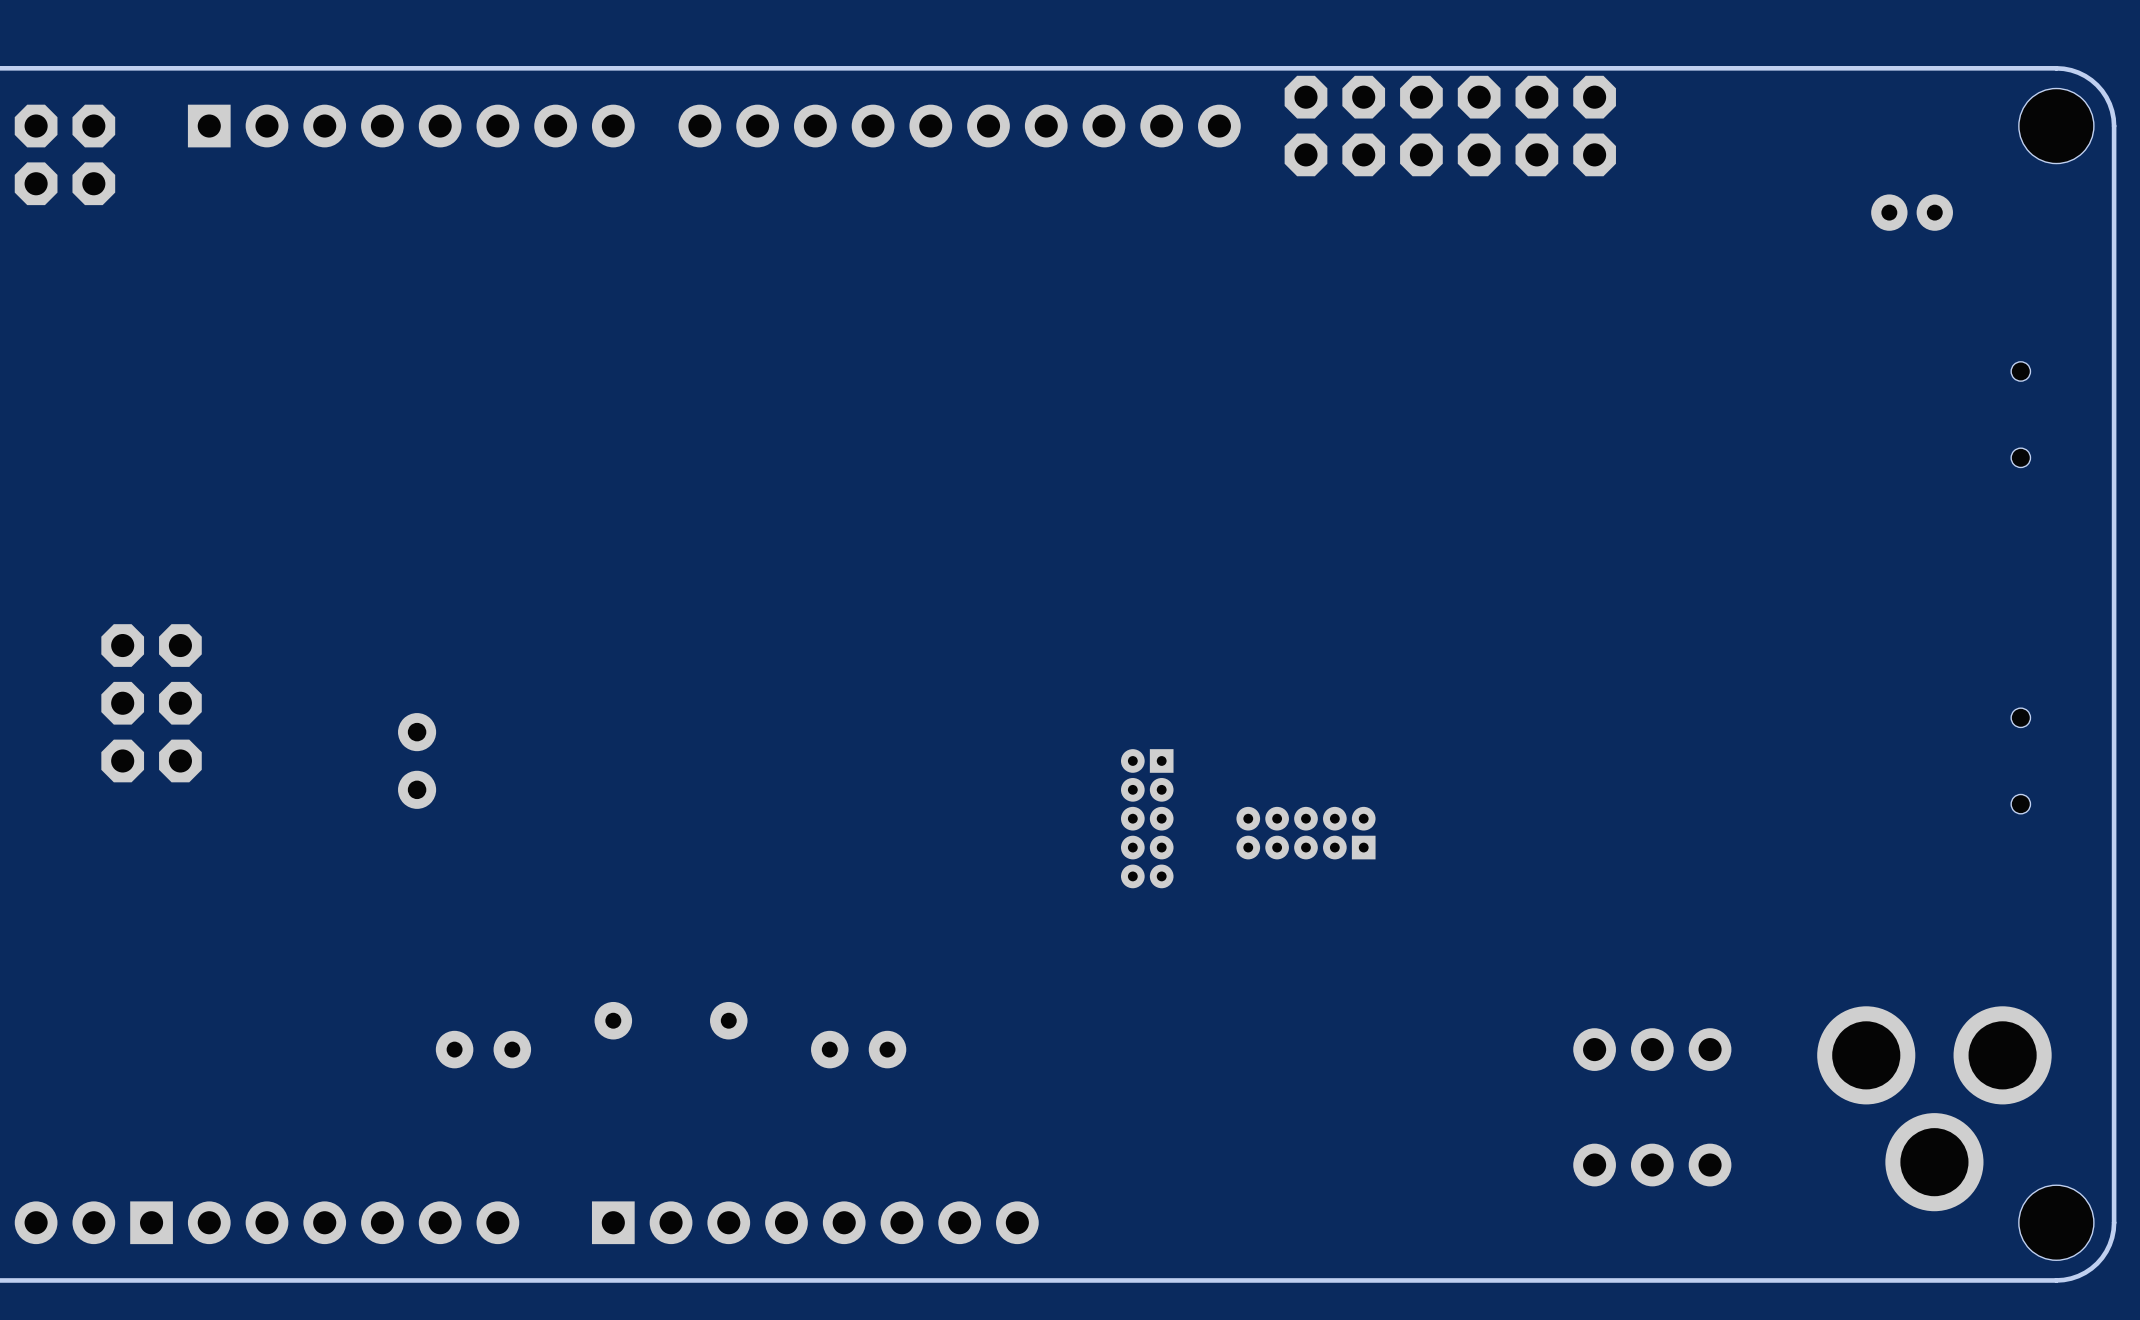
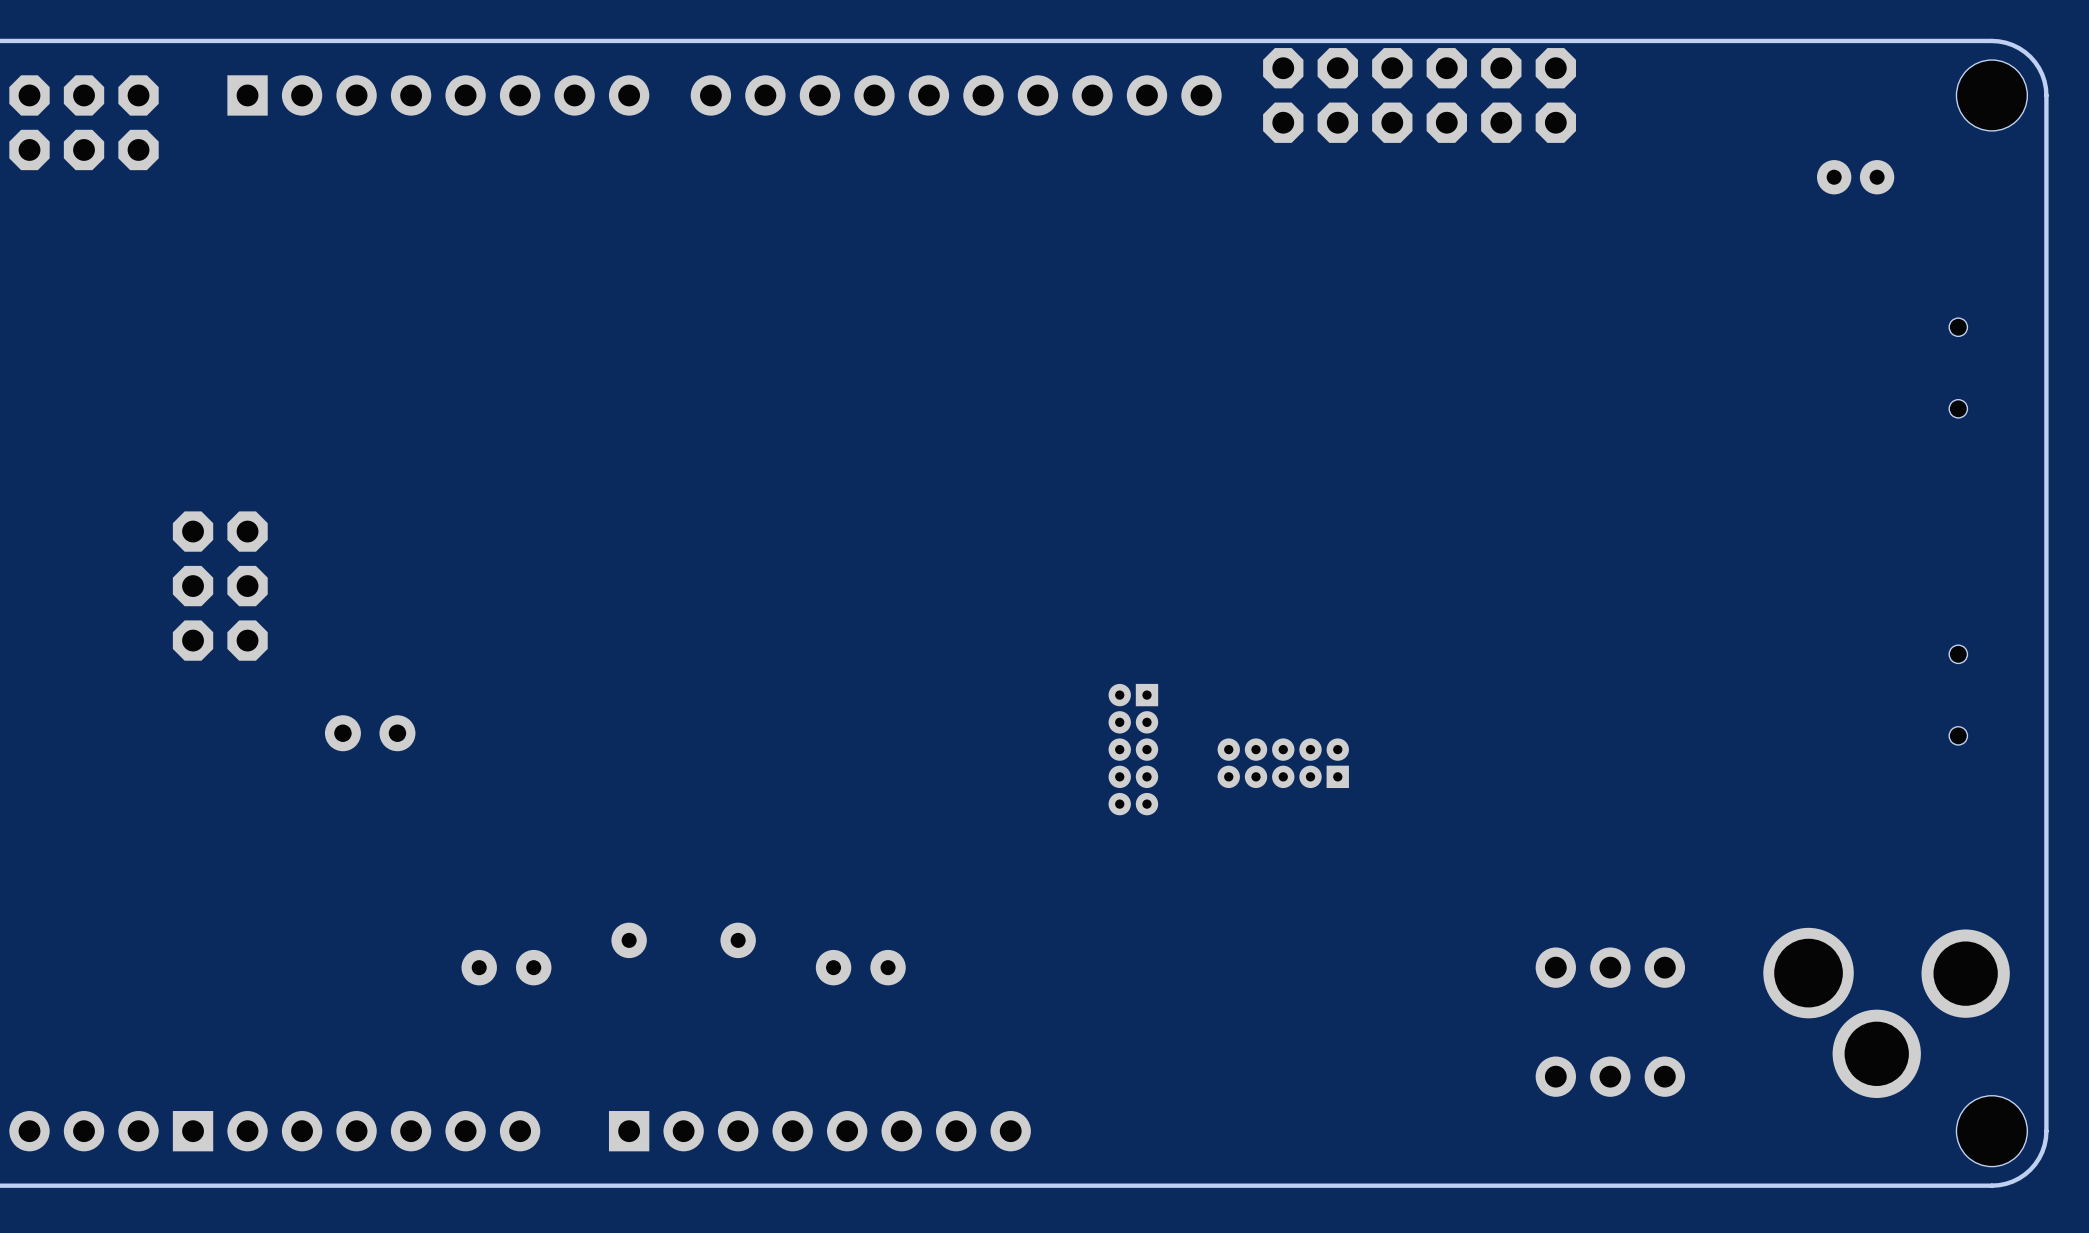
part position: (151, 703) -> (220, 586)
part rotation: 0° (417, 760) -> 90° clockwise (370, 733)
part position: (417, 760) -> (370, 733)
part footprint: [1817, 1006, 2052, 1212] -> [1763, 927, 2010, 1098]

